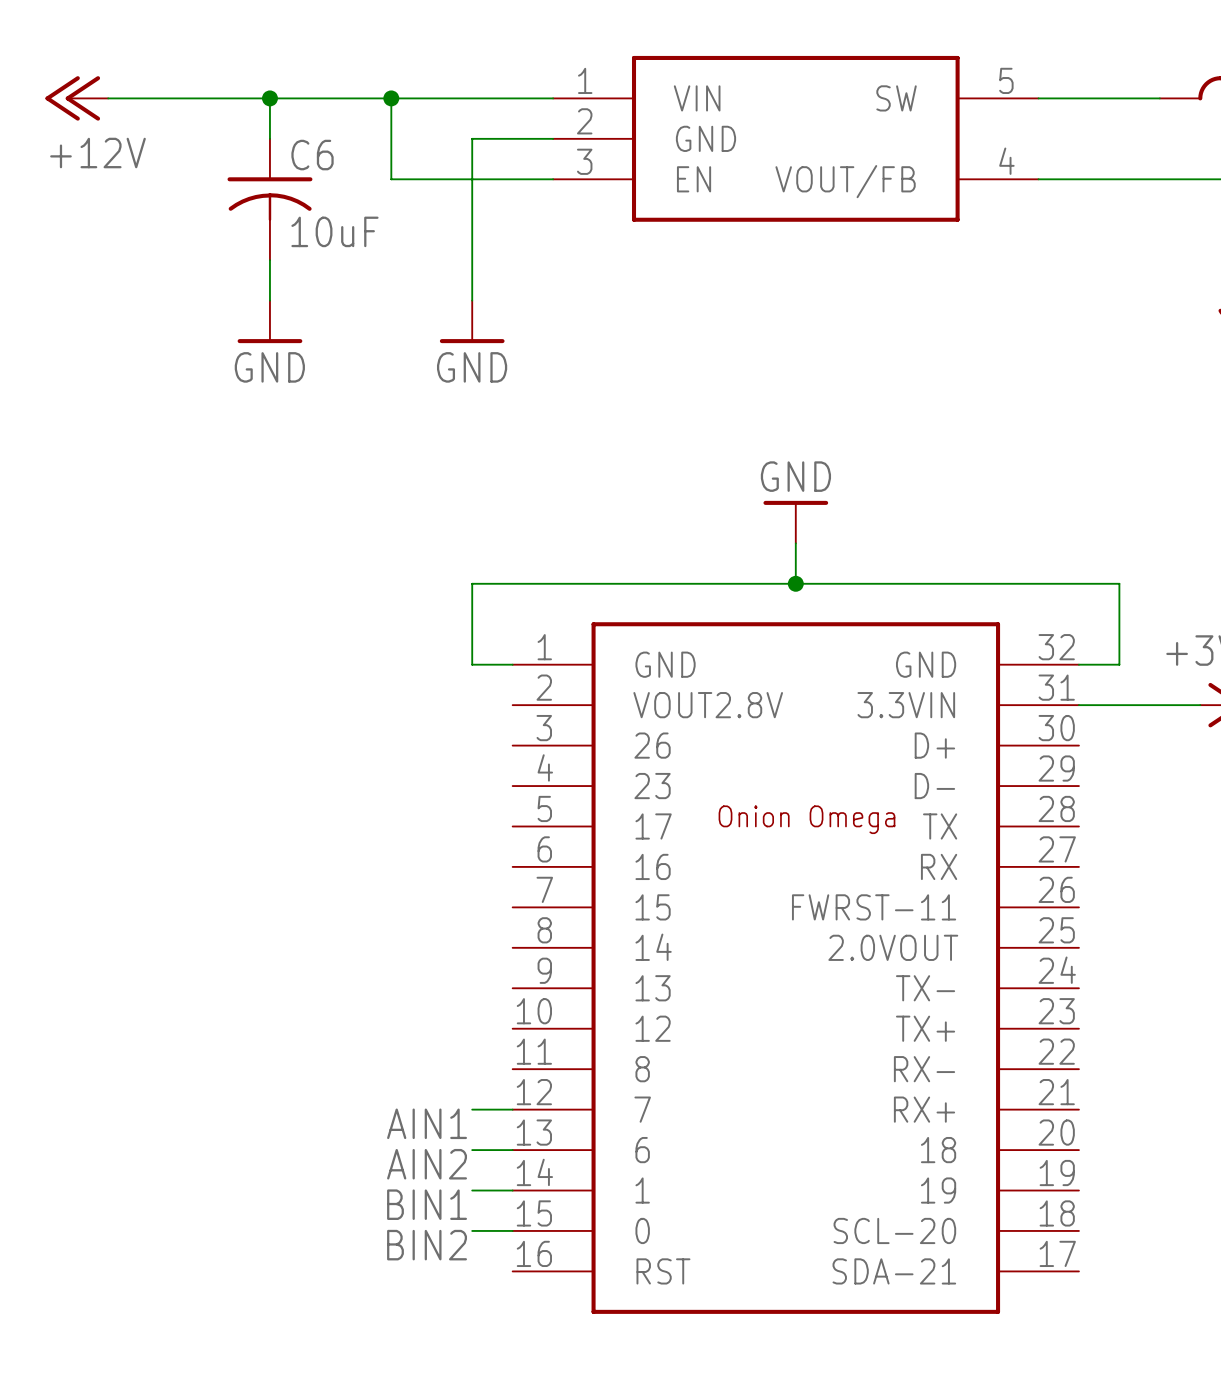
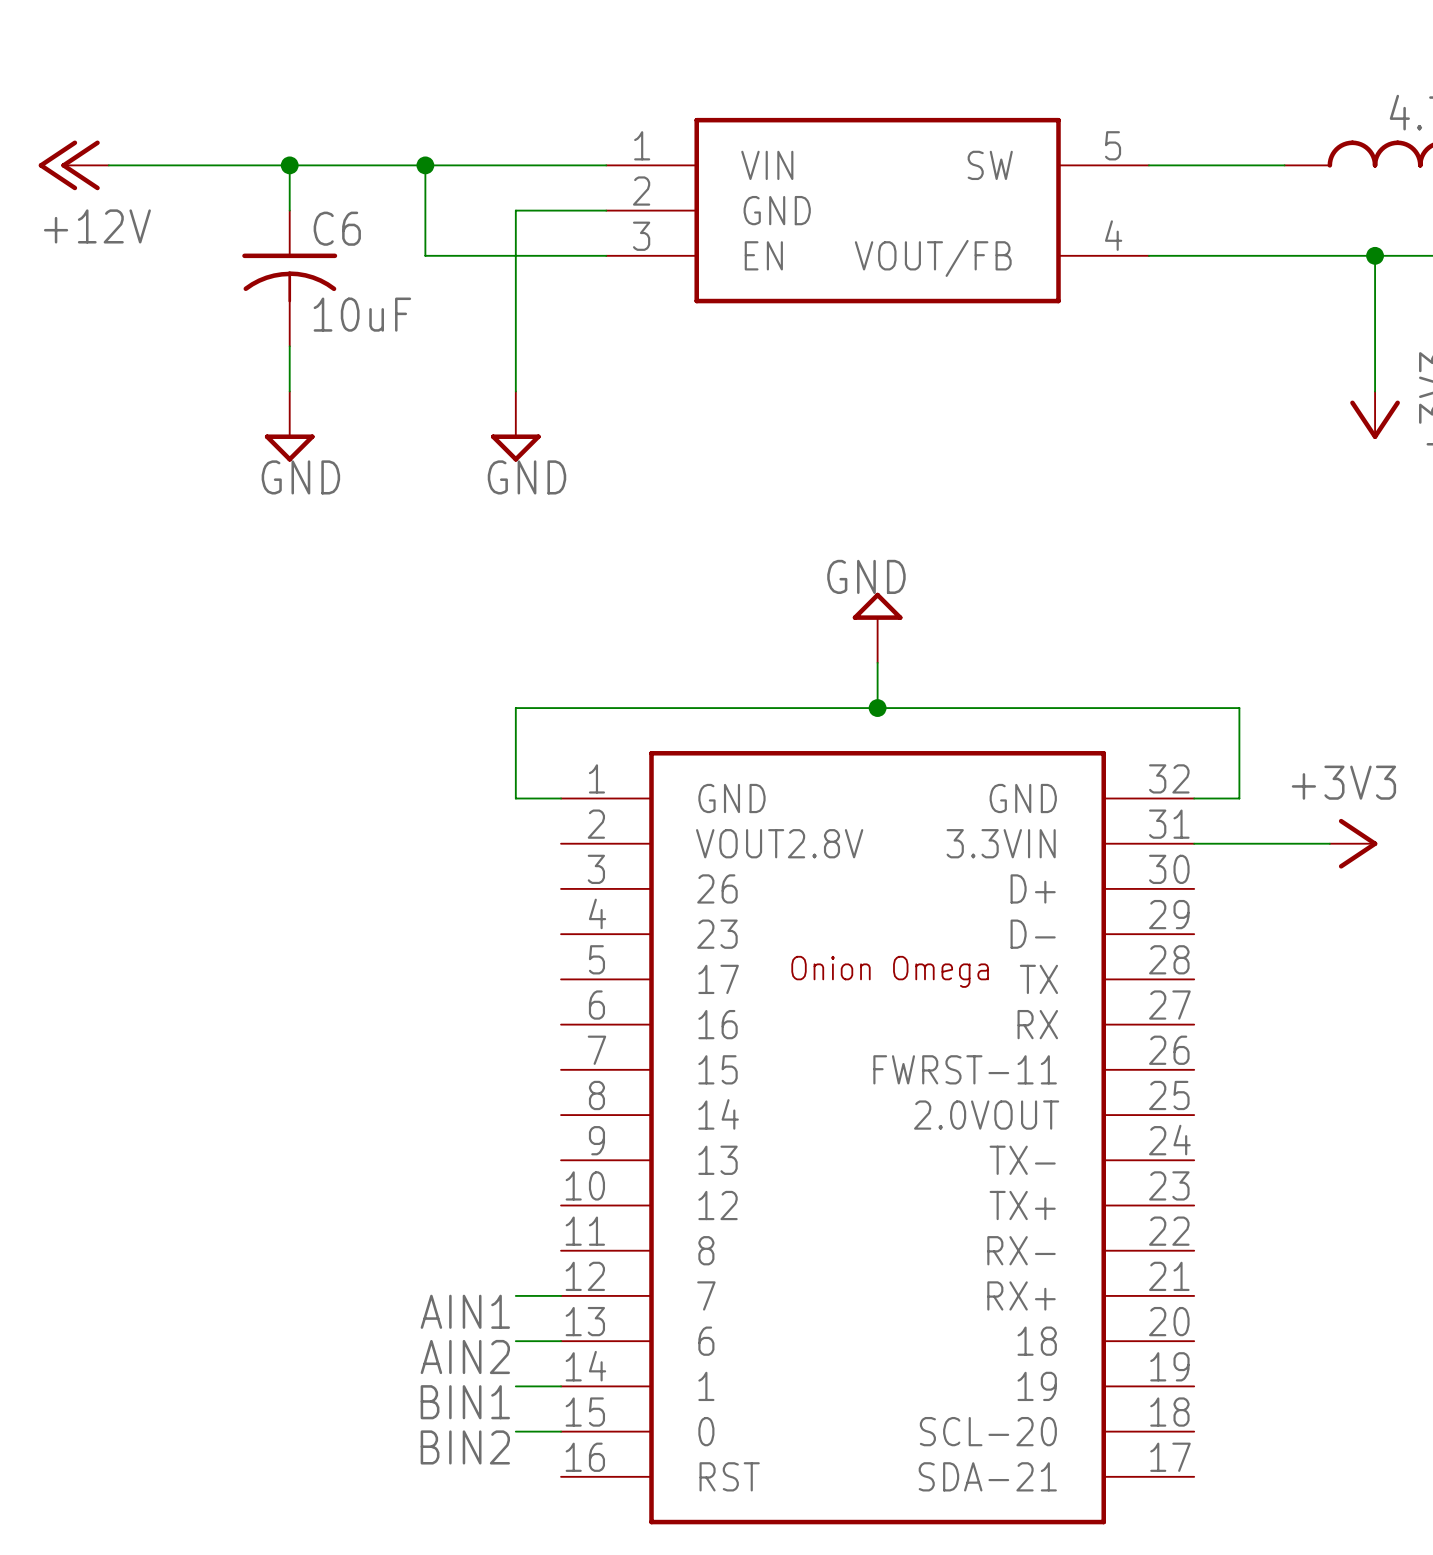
power symbol shape: [237, 300, 303, 344] -> [264, 391, 315, 462]
power symbol shape: [439, 300, 505, 344] -> [490, 391, 541, 462]
power symbol shape: [763, 500, 829, 544] -> [852, 592, 903, 663]

